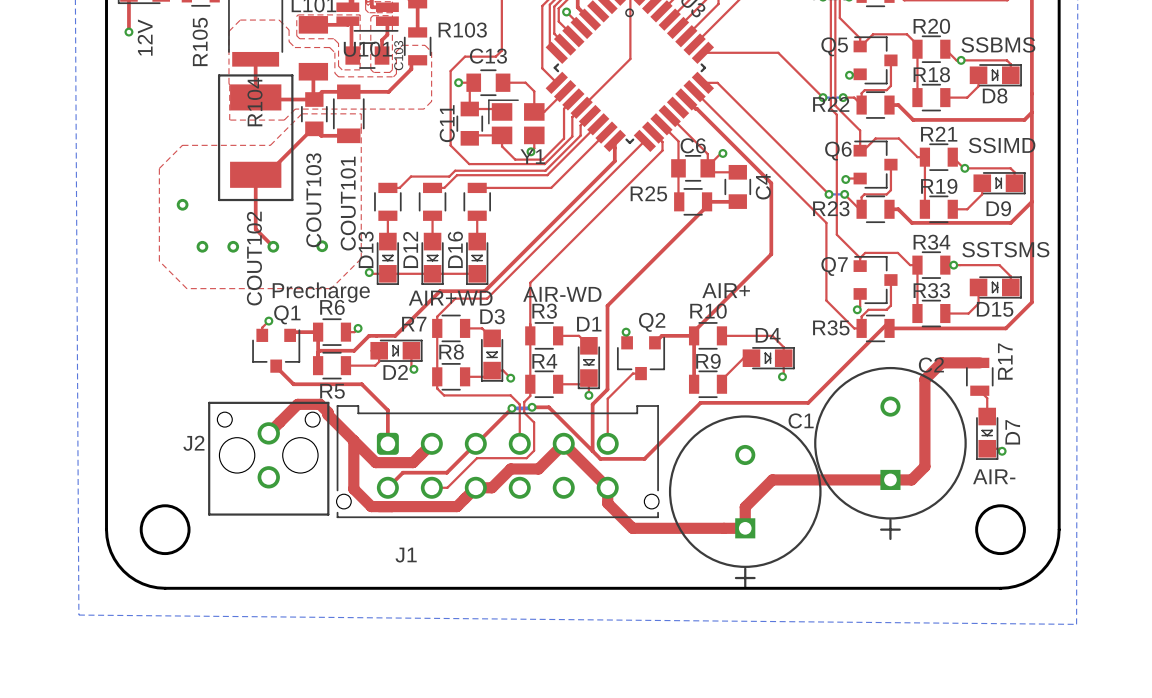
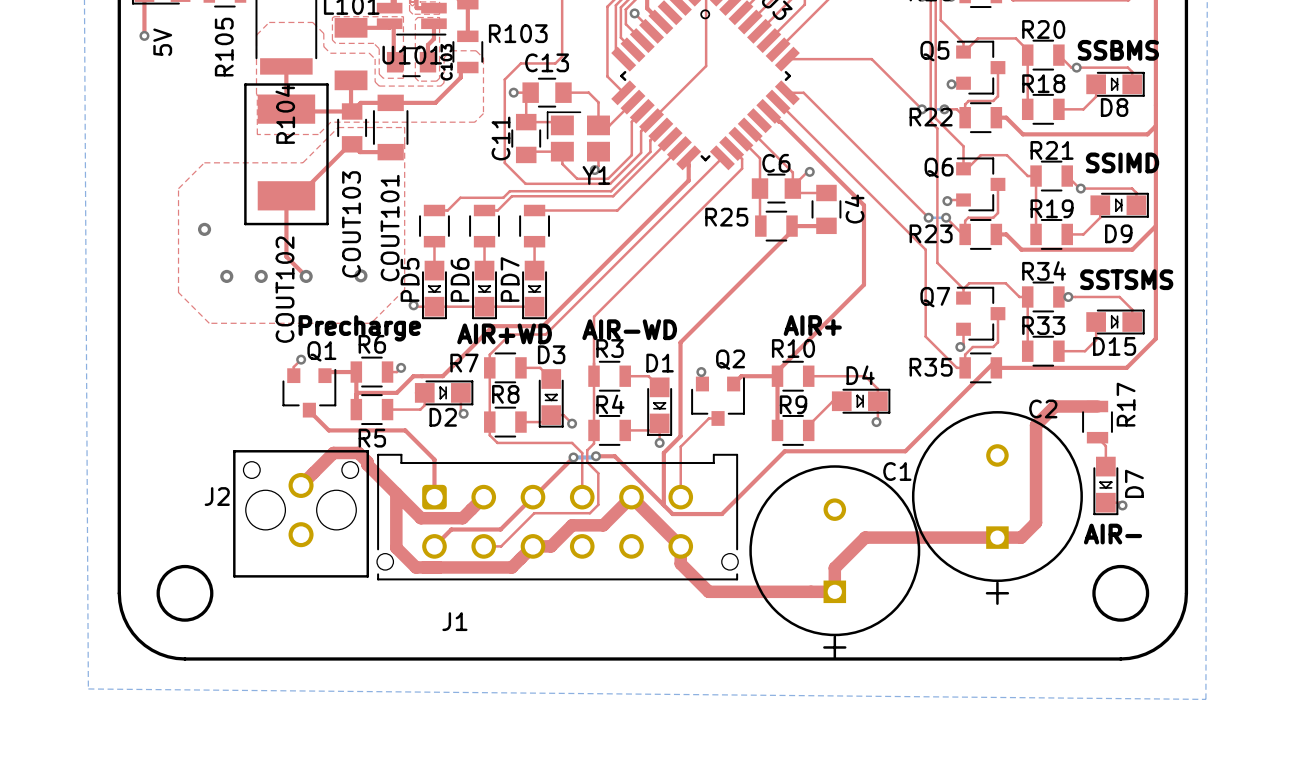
12V name: 12V (145, 37) -> 5V (162, 42)
D13 name: D13 (366, 249) -> PD5 (410, 279)
D12 name: D12 (410, 249) -> PD6 (460, 279)
D16 name: D16 (455, 249) -> PD7 (510, 279)

